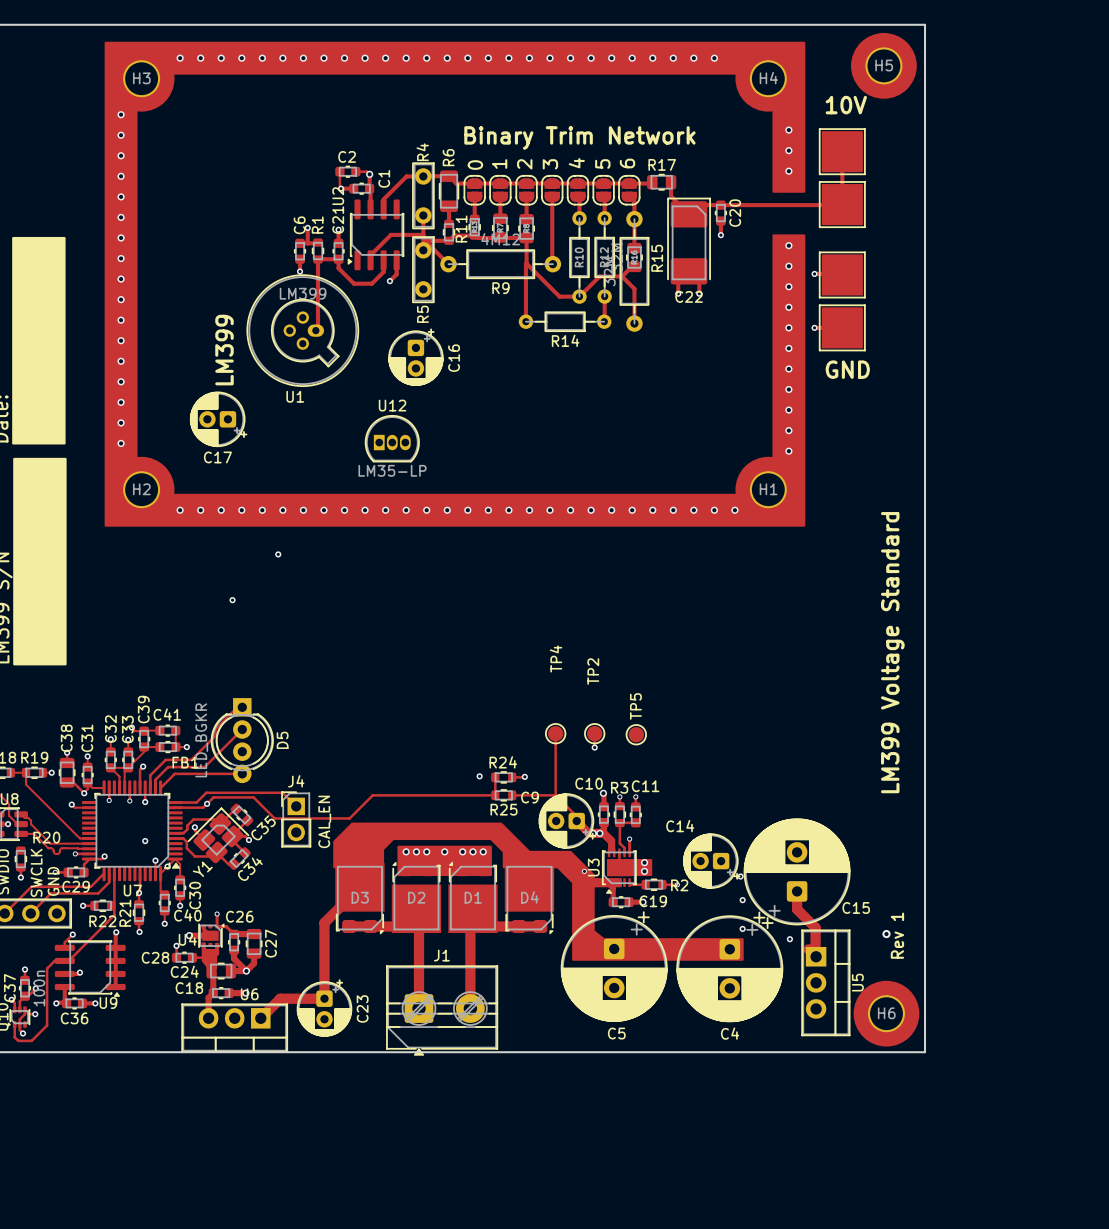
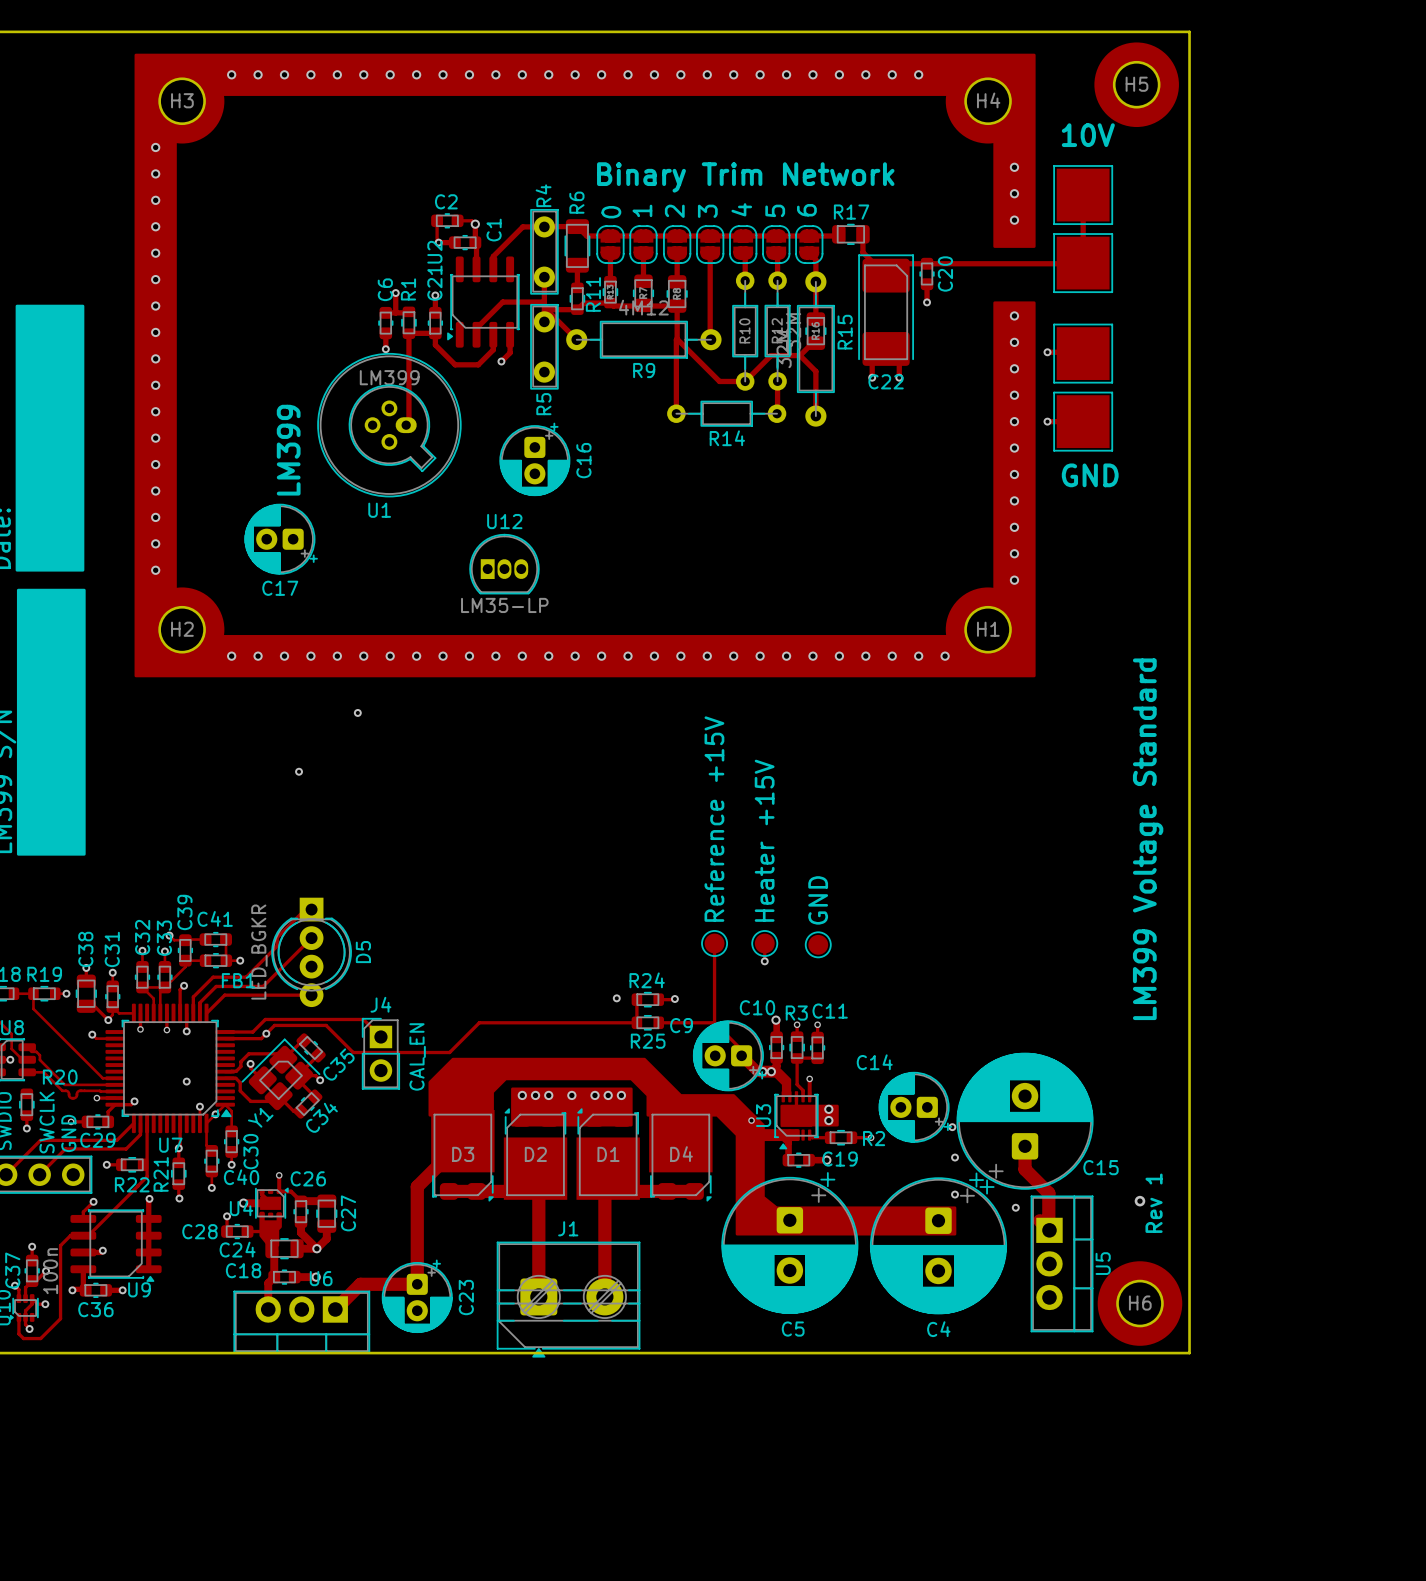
text: none -> Reference +15V (714, 819)
text: none -> Heater +15V (764, 840)
TP4 name: TP4 (556, 658) -> none
TP2 name: TP2 (593, 671) -> none
text: none -> GND (818, 900)
TP5 name: TP5 (635, 706) -> none

